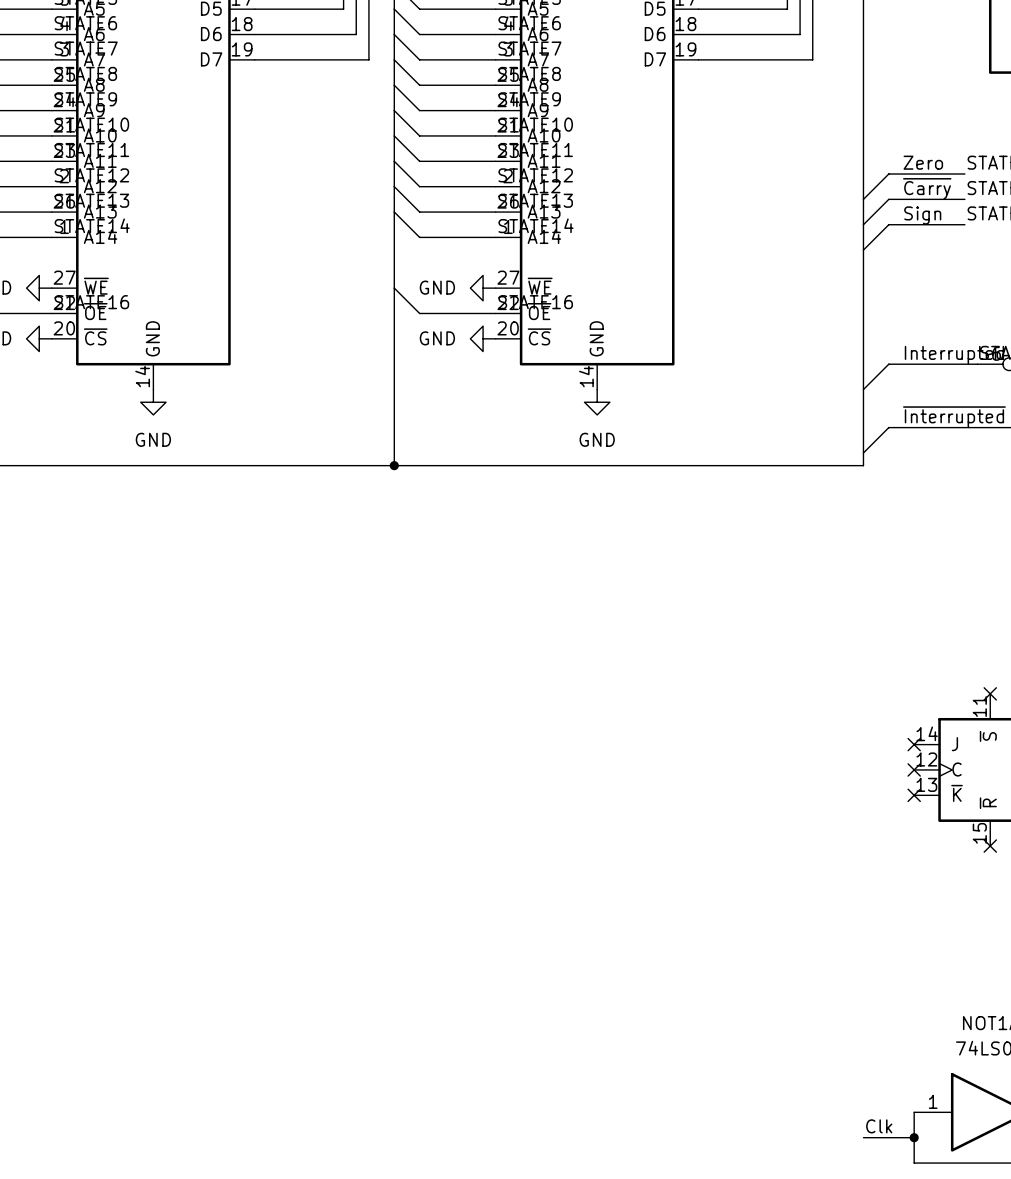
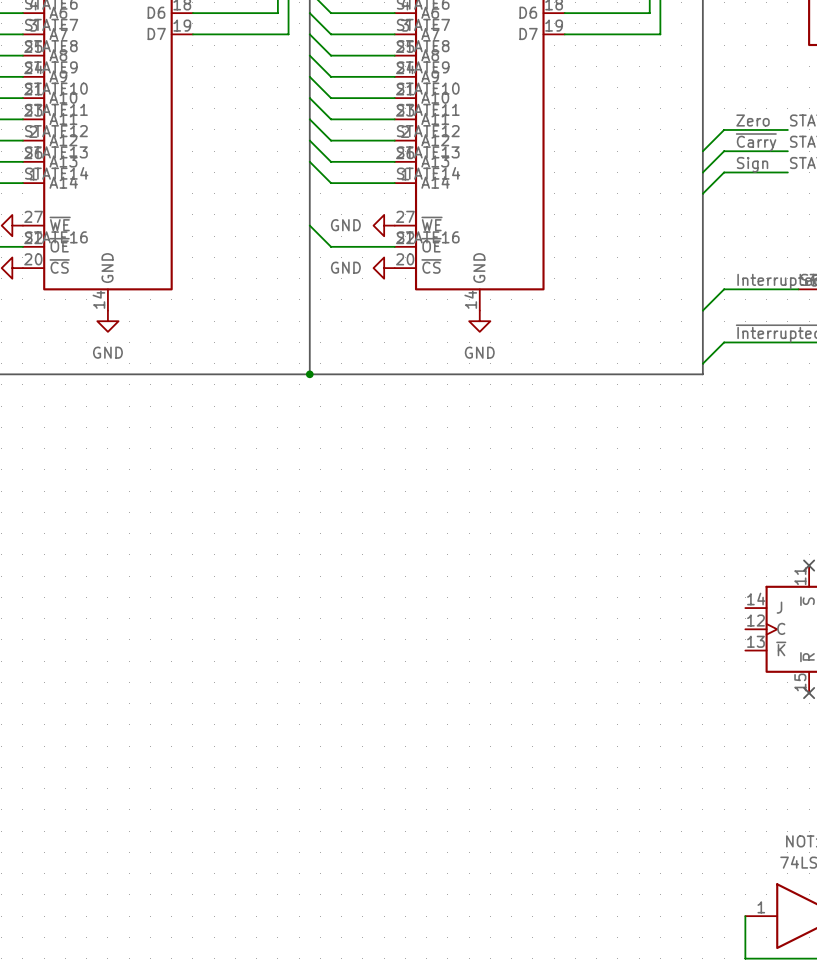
no-connect mark: (914, 744) -> none
no-connect mark: (914, 769) -> none
no-connect mark: (914, 795) -> none
label: Clk (879, 1126) -> none
wire: (863, 1137) (914, 1137) -> none
junction: (914, 1137) -> none

